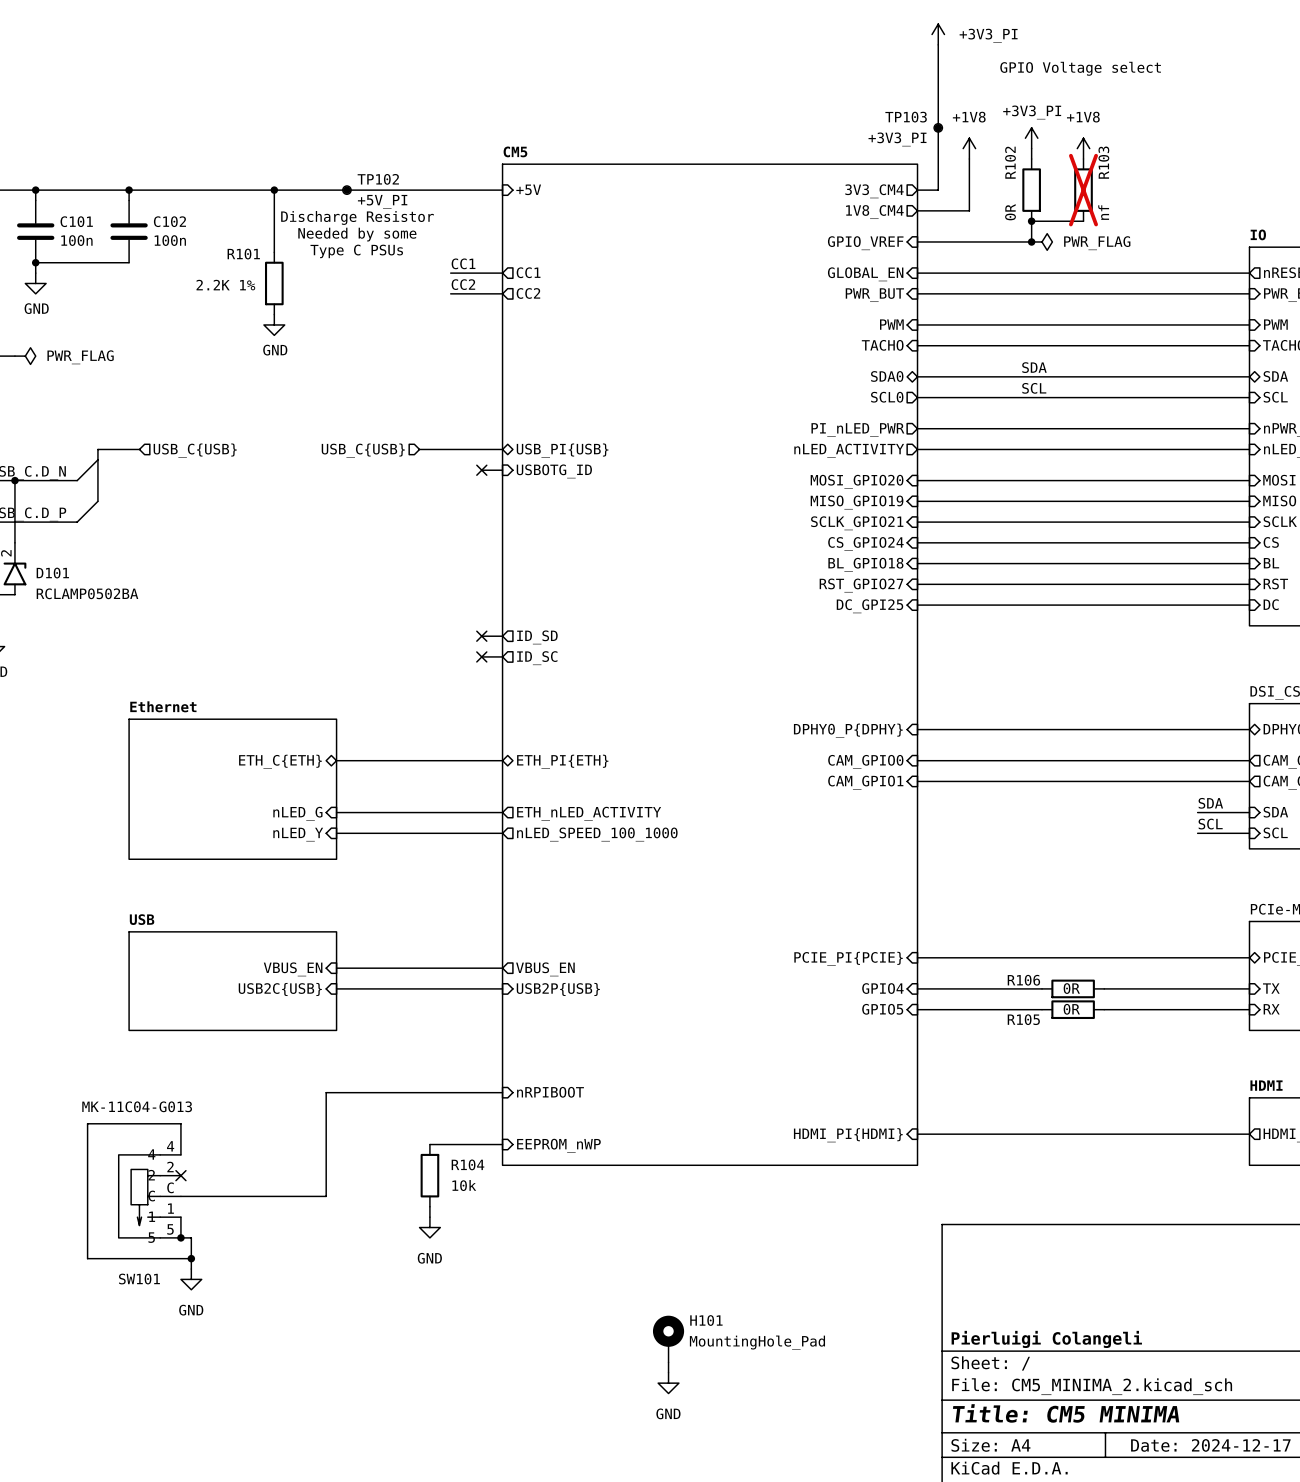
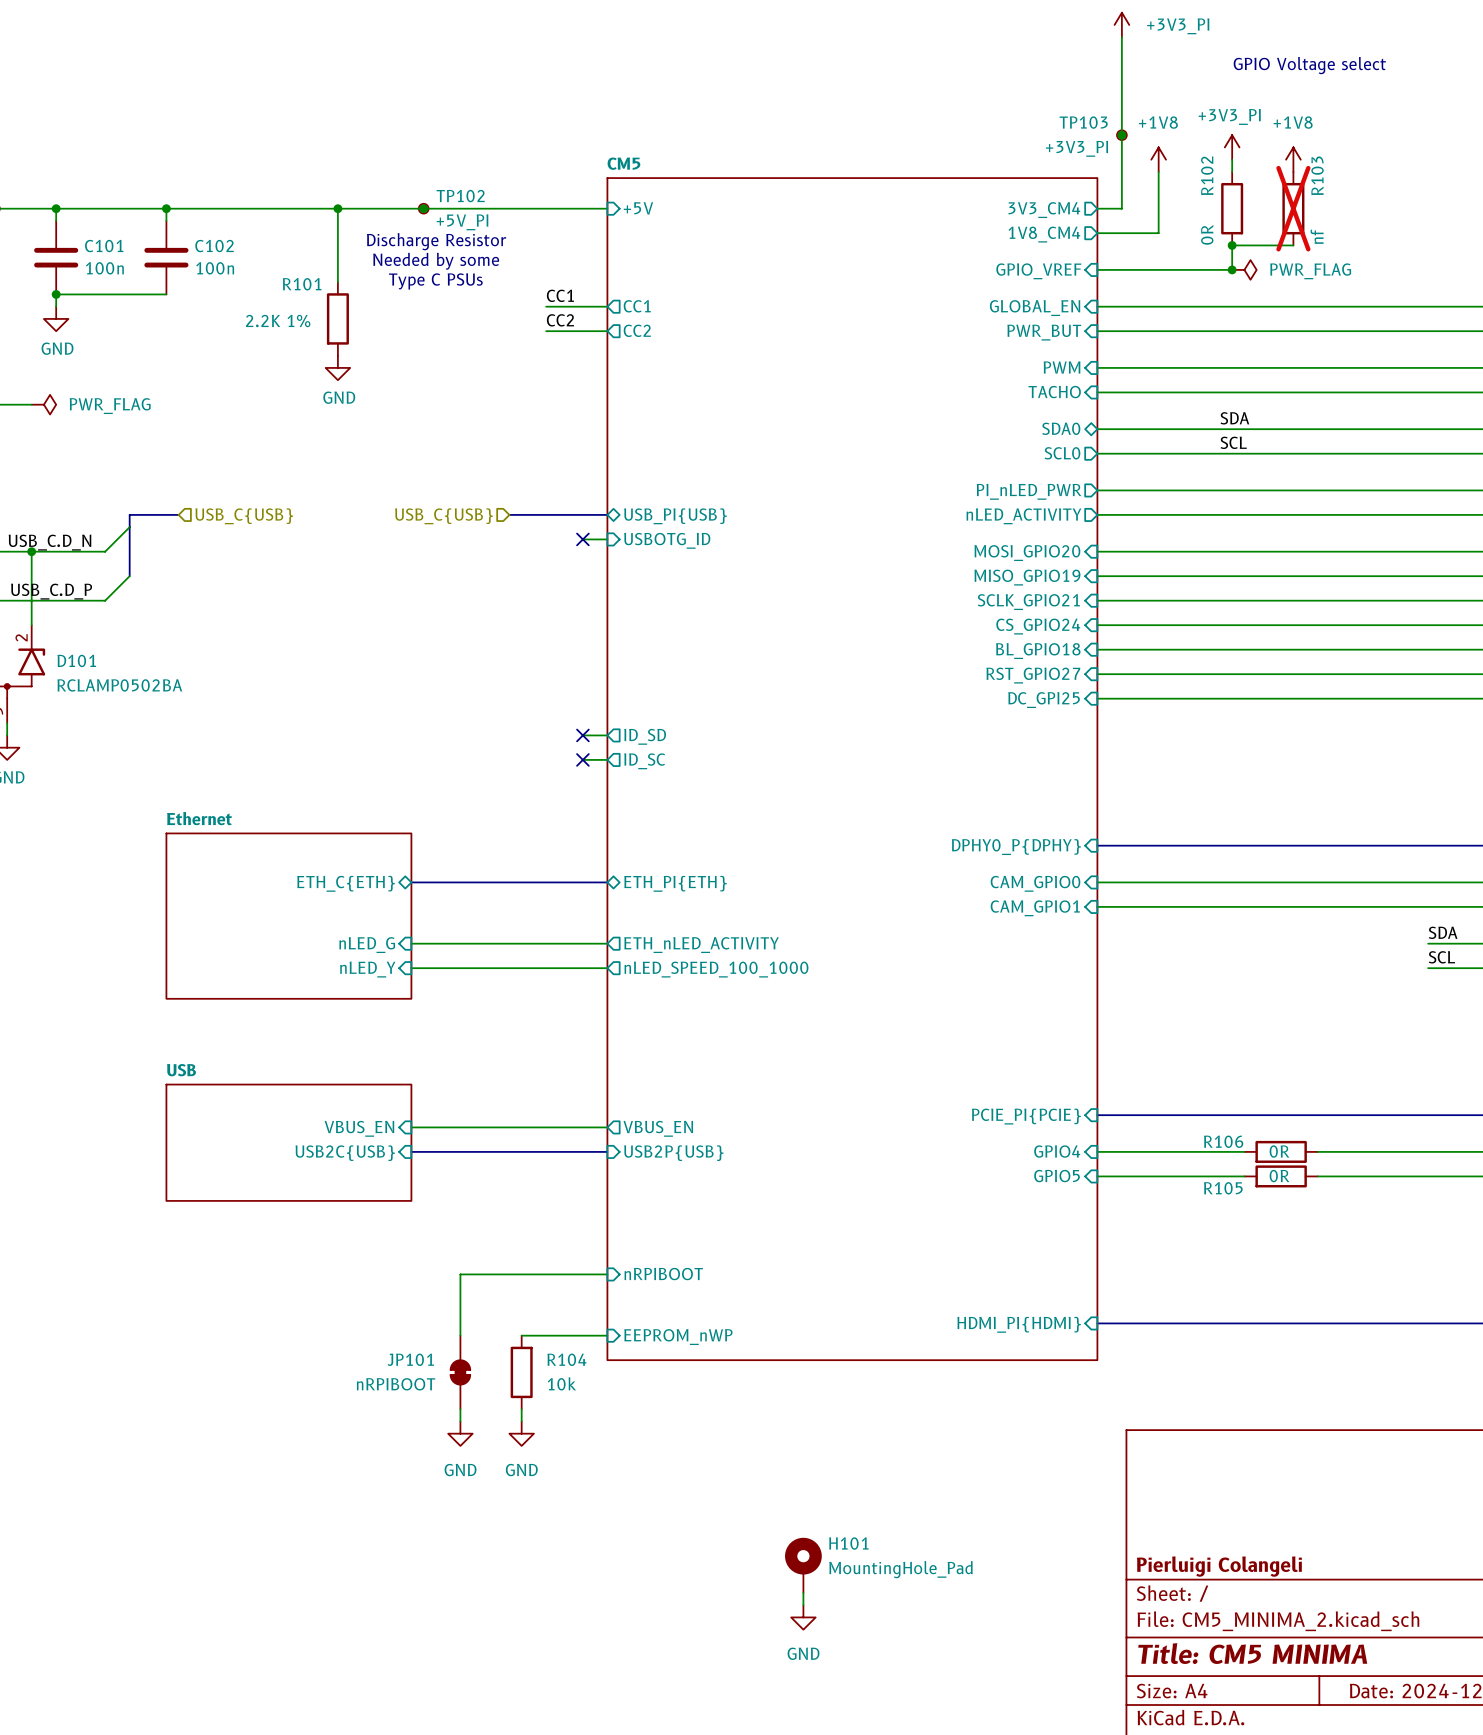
wire: (378, 1092) (326, 1092) (326, 1196) (180, 1196) -> (460, 1274) (460, 1335)
wire: (180, 1154) (180, 1123) (87, 1123) (87, 1258) (191, 1258) -> none
no-connect mark: (180, 1175) -> none
JP101: none -> nRPIBOOT (460, 1372)
SW101: MK-11C04-G013 (149, 1196) -> none
wire: none -> (460, 1409) (460, 1421)
wire: (180, 1217) (180, 1237) (191, 1237) (191, 1269) -> none
junction: (180, 1237) -> none
junction: (191, 1258) -> none
power symbol position: GND (191, 1279) -> GND (460, 1433)

